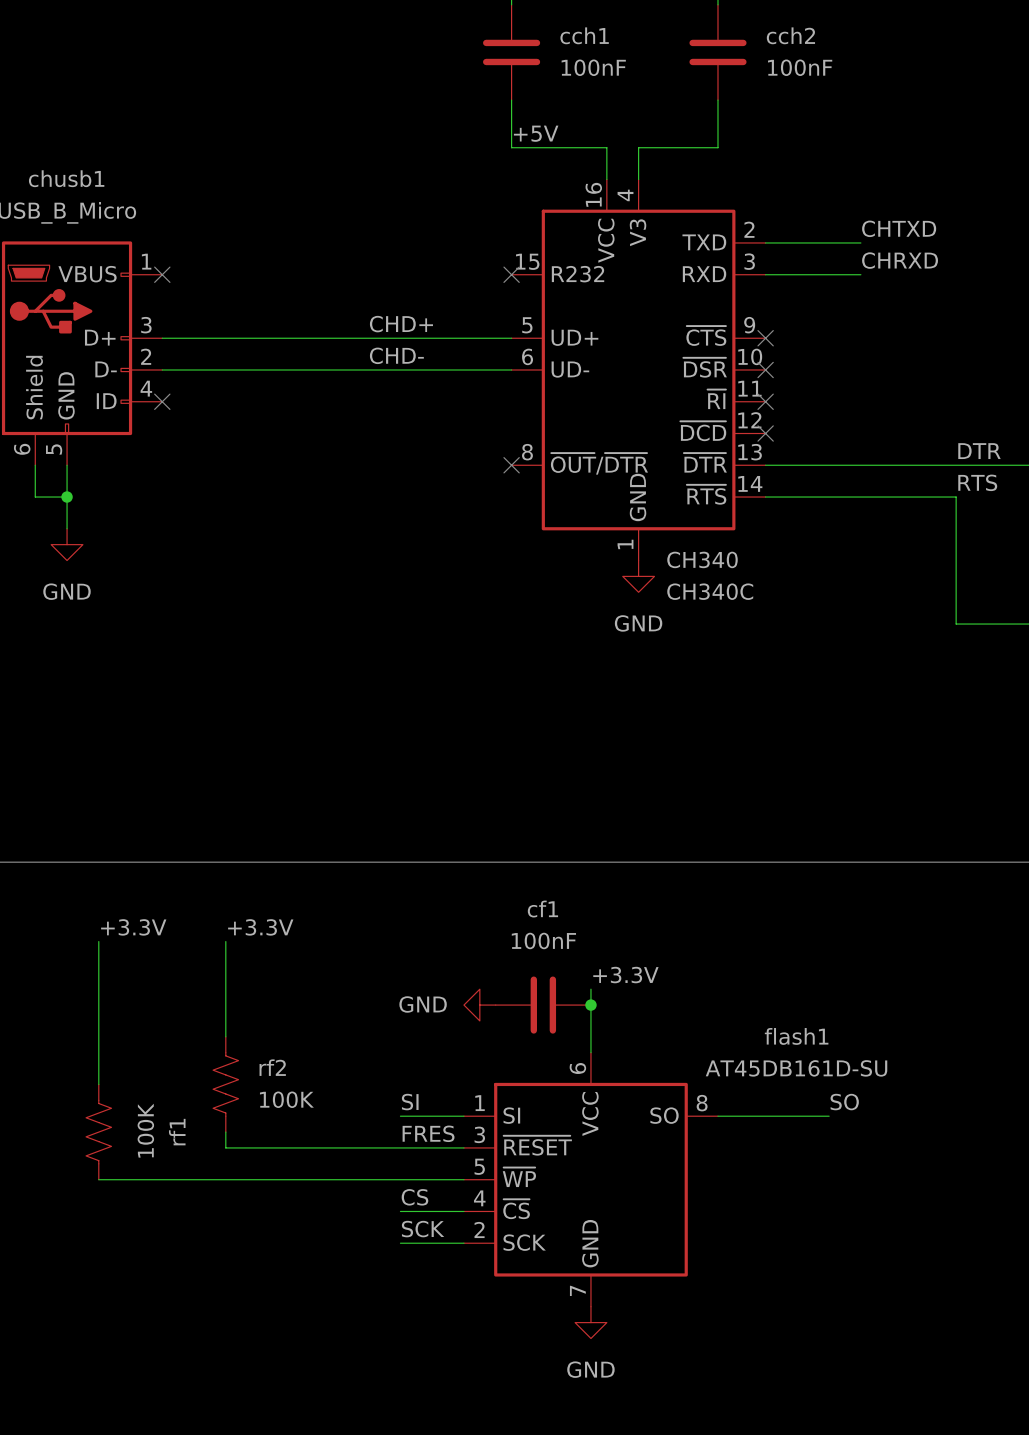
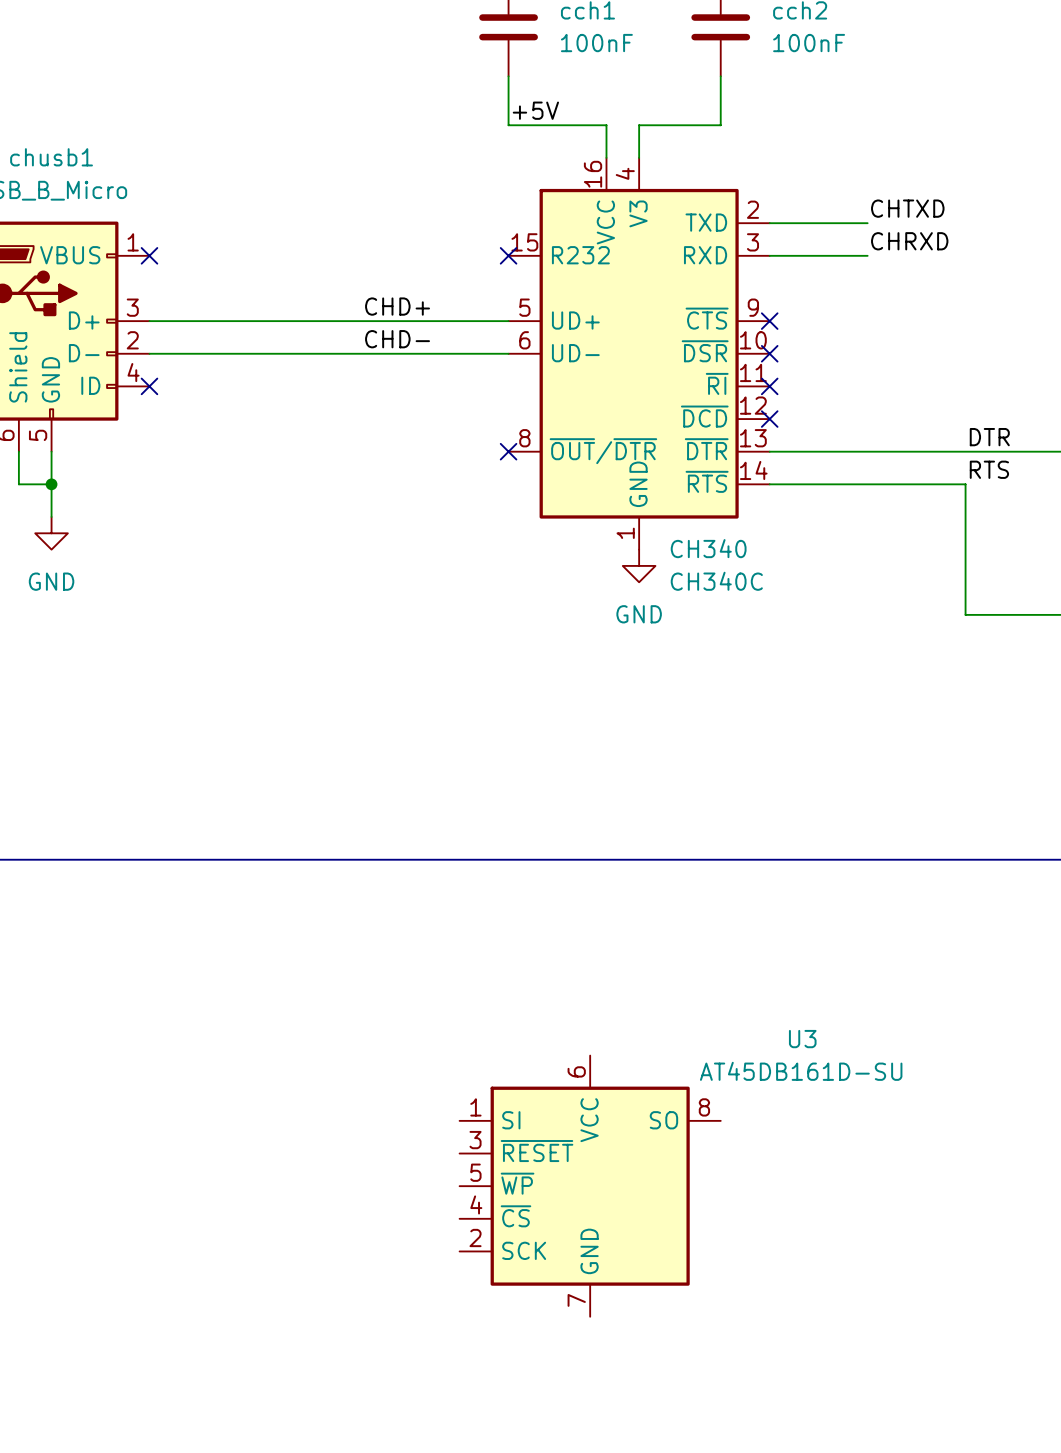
label: +3.3V (133, 927) -> none
label: +3.3V (260, 927) -> none
wire: (98, 941) (98, 1084) -> none
wire: (225, 941) (225, 1036) -> none
label: +3.3V (625, 975) -> none
wire: (590, 989) (590, 1052) -> none
power symbol: GND (479, 1005) -> none
cf1: 100nF (543, 1005) -> none
junction: (590, 1005) -> none
flash1 name: flash1 (796, 1036) -> U3 (802, 1039)
rf2: 100K (225, 1084) -> none
label: SI (410, 1102) -> none
label: SO (844, 1102) -> none
wire: (400, 1116) (463, 1116) -> none
wire: (717, 1116) (829, 1116) -> none
rf1: 100K (98, 1132) -> none
wire: (225, 1132) (225, 1147) (463, 1147) -> none
label: FRES (428, 1133) -> none
wire: (98, 1179) (463, 1179) -> none
label: CS (414, 1197) -> none
wire: (400, 1211) (463, 1211) -> none
label: SCK (423, 1229) -> none
wire: (400, 1243) (463, 1243) -> none
power symbol: GND (590, 1322) -> none

